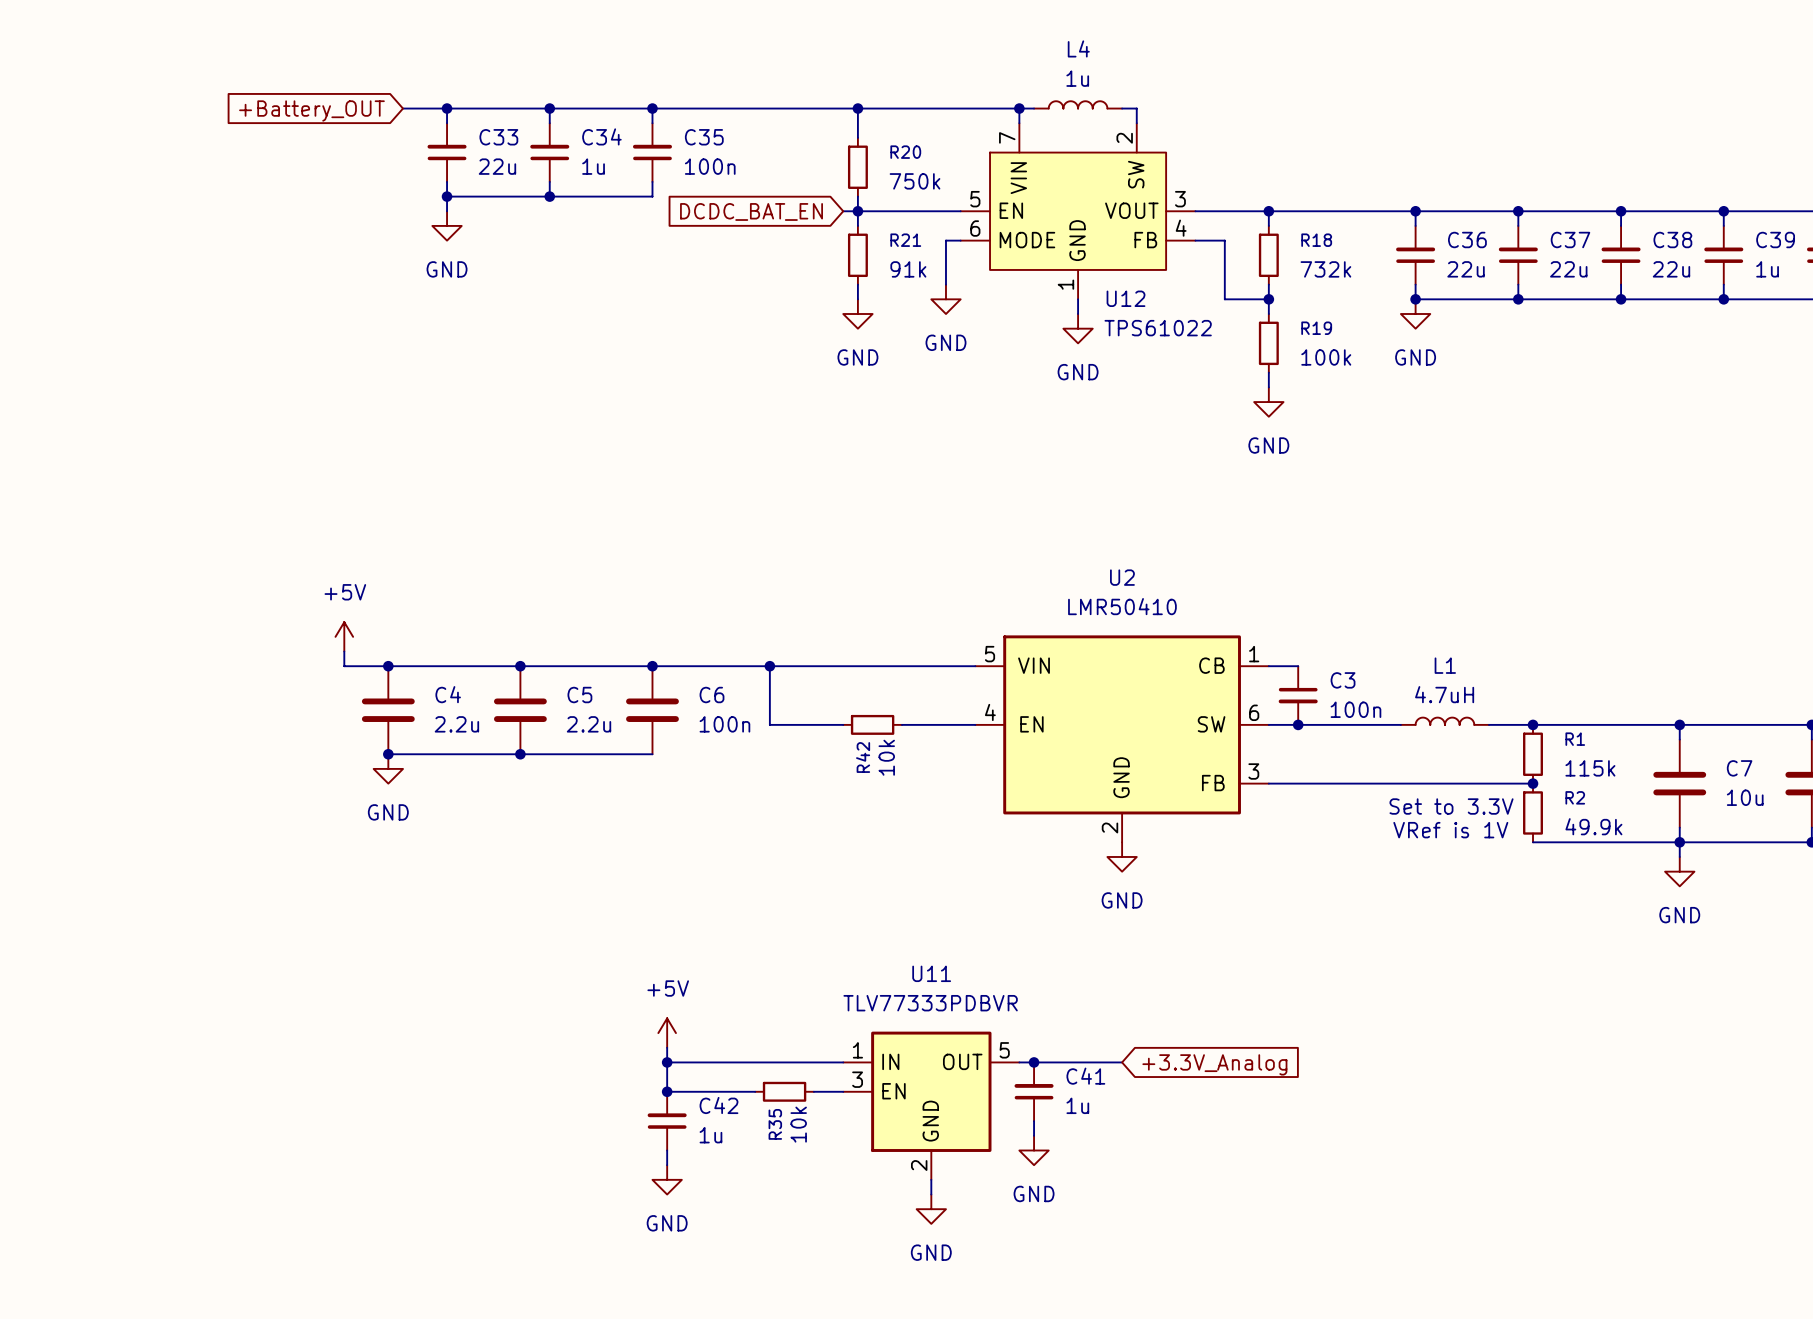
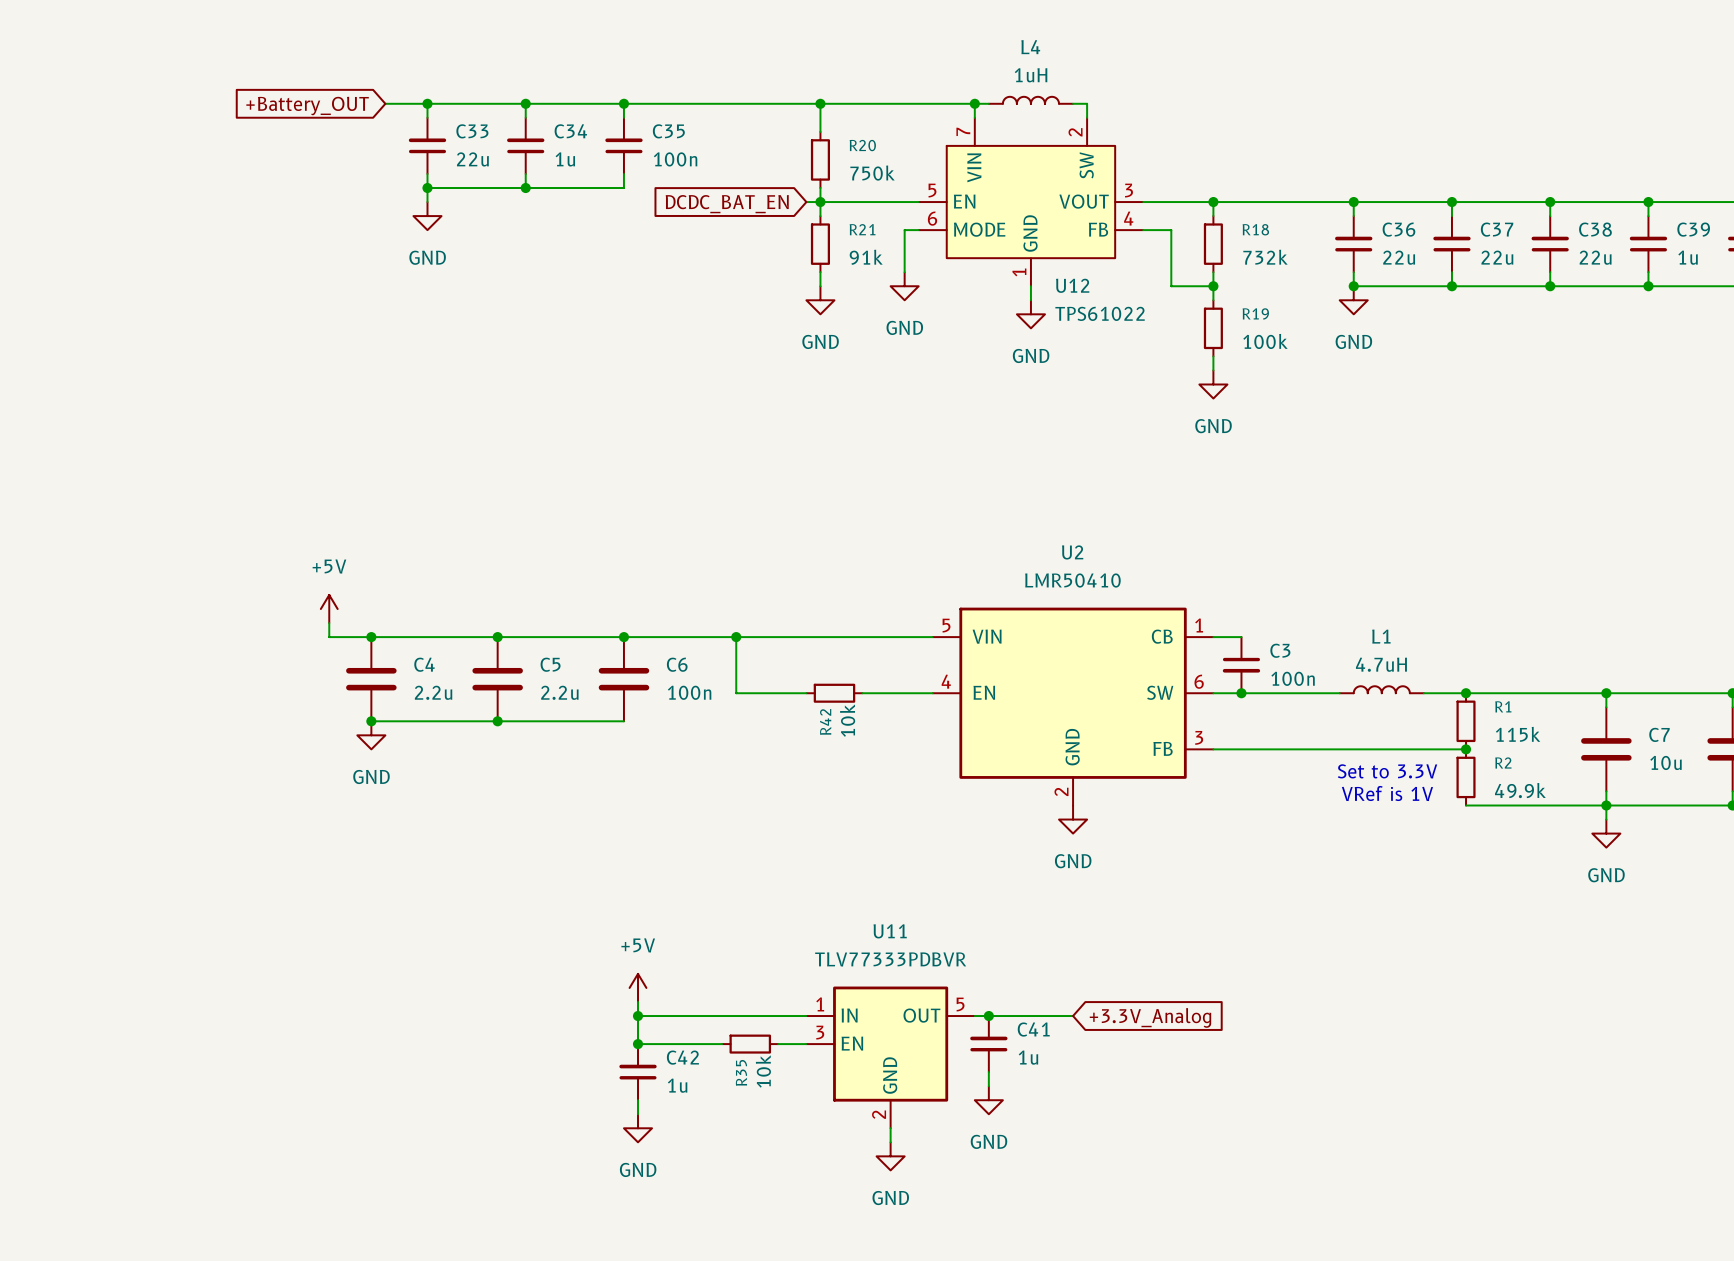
L4 value: 1u (1077, 78) -> 1uH (1031, 75)

